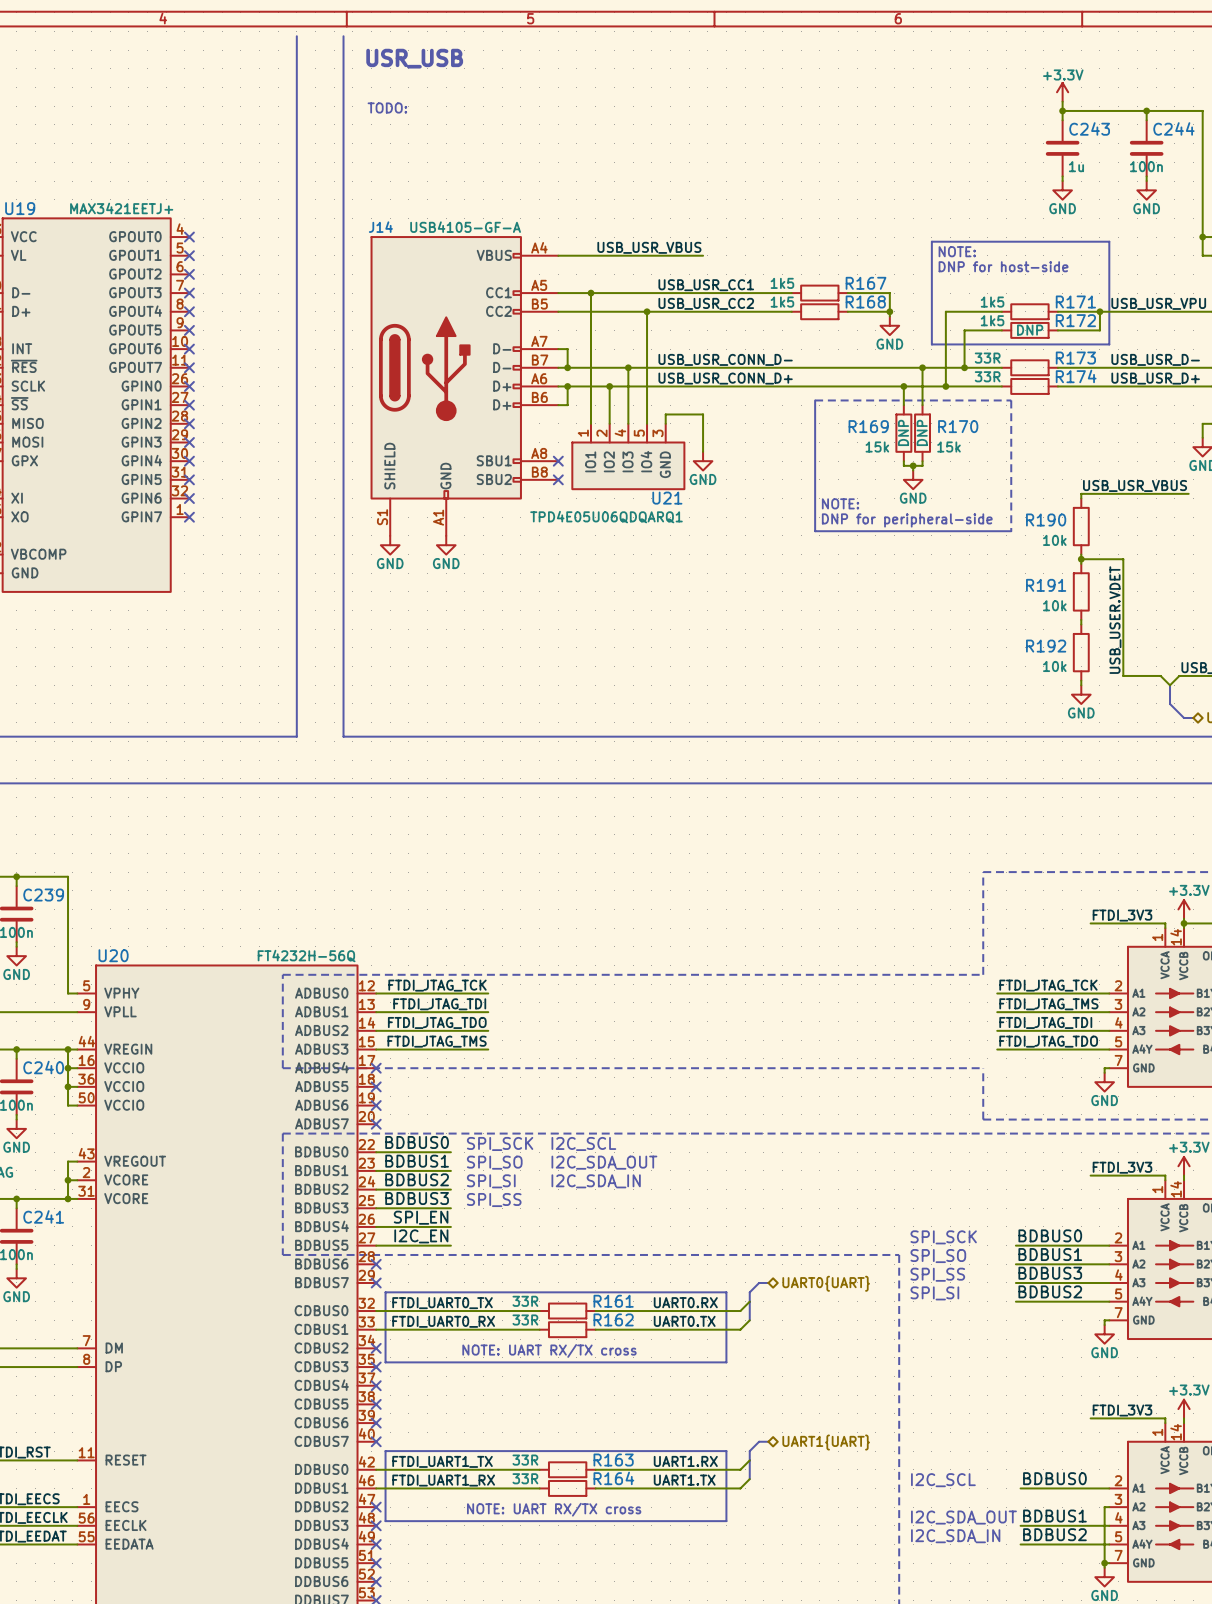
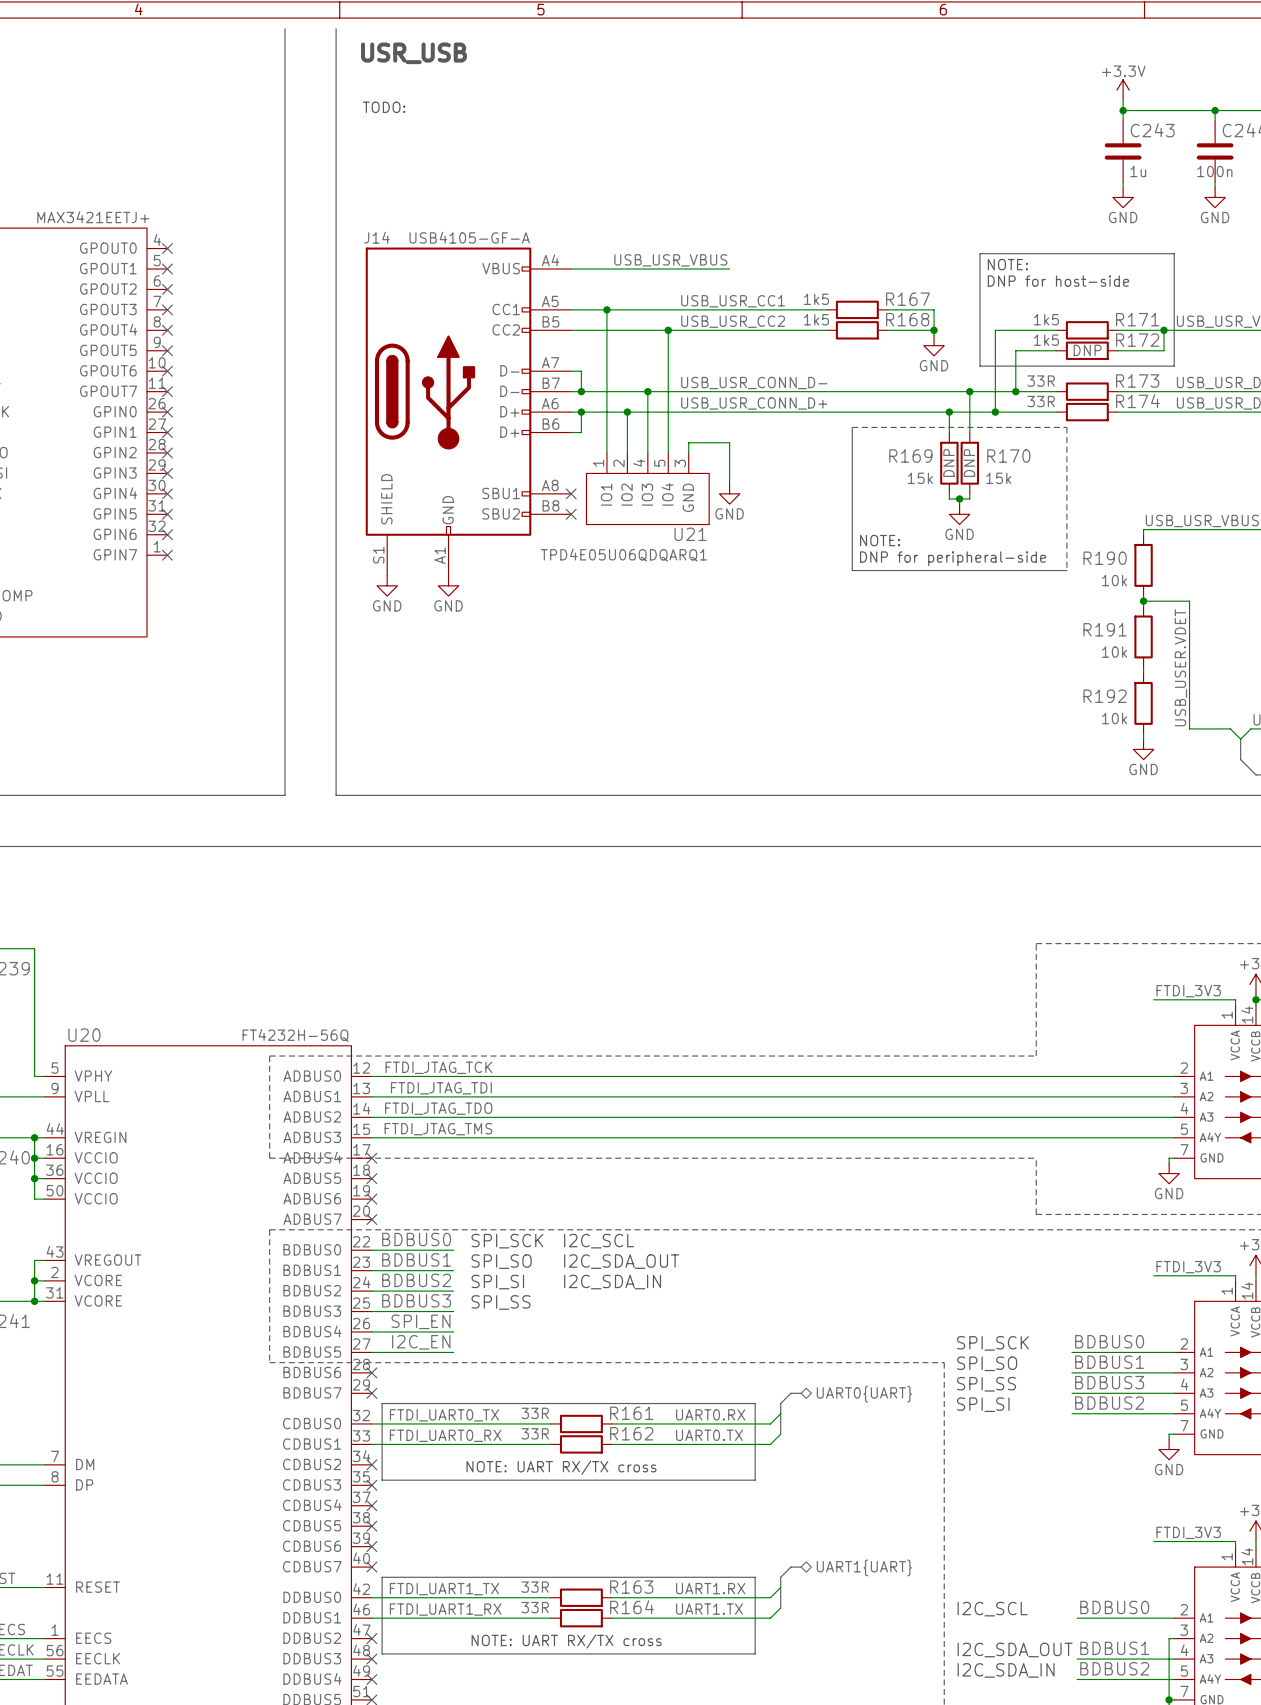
label: FTDI_JTAG_TCK (1048, 985) -> none
wire: none -> (494, 1076) (1051, 1076)
label: FTDI_JTAG_TMS (1048, 1004) -> none
wire: none -> (494, 1096) (1051, 1096)
label: FTDI_JTAG_TDI (1045, 1022) -> none
wire: none -> (494, 1117) (1051, 1117)
label: FTDI_JTAG_TDO (1048, 1041) -> none
wire: none -> (494, 1137) (1051, 1137)

